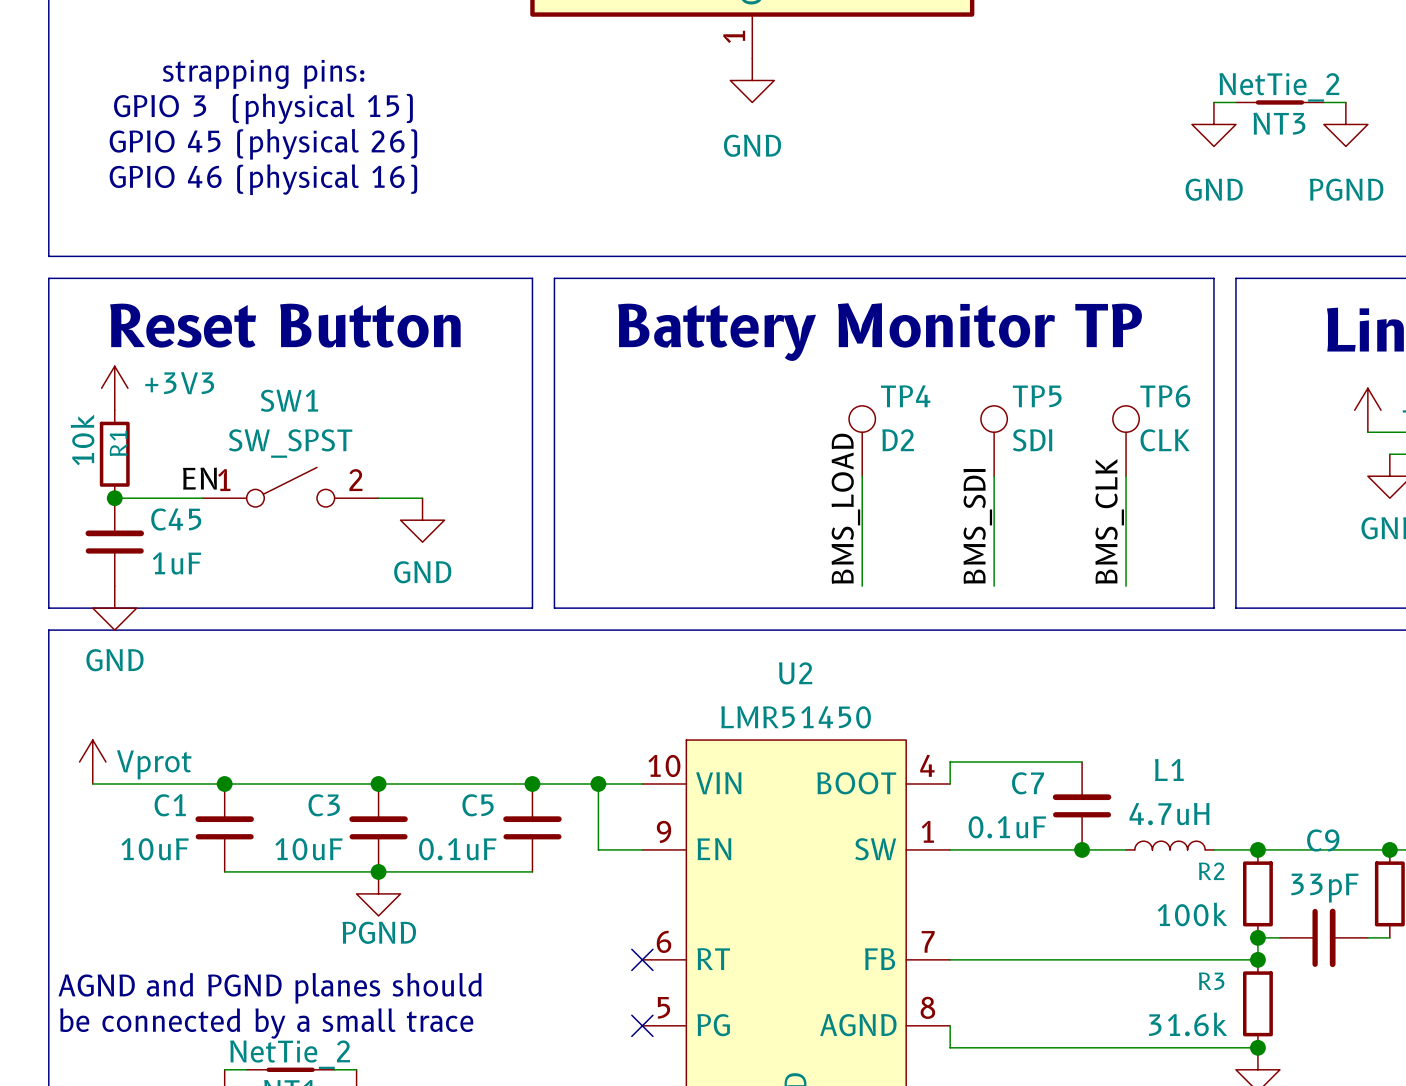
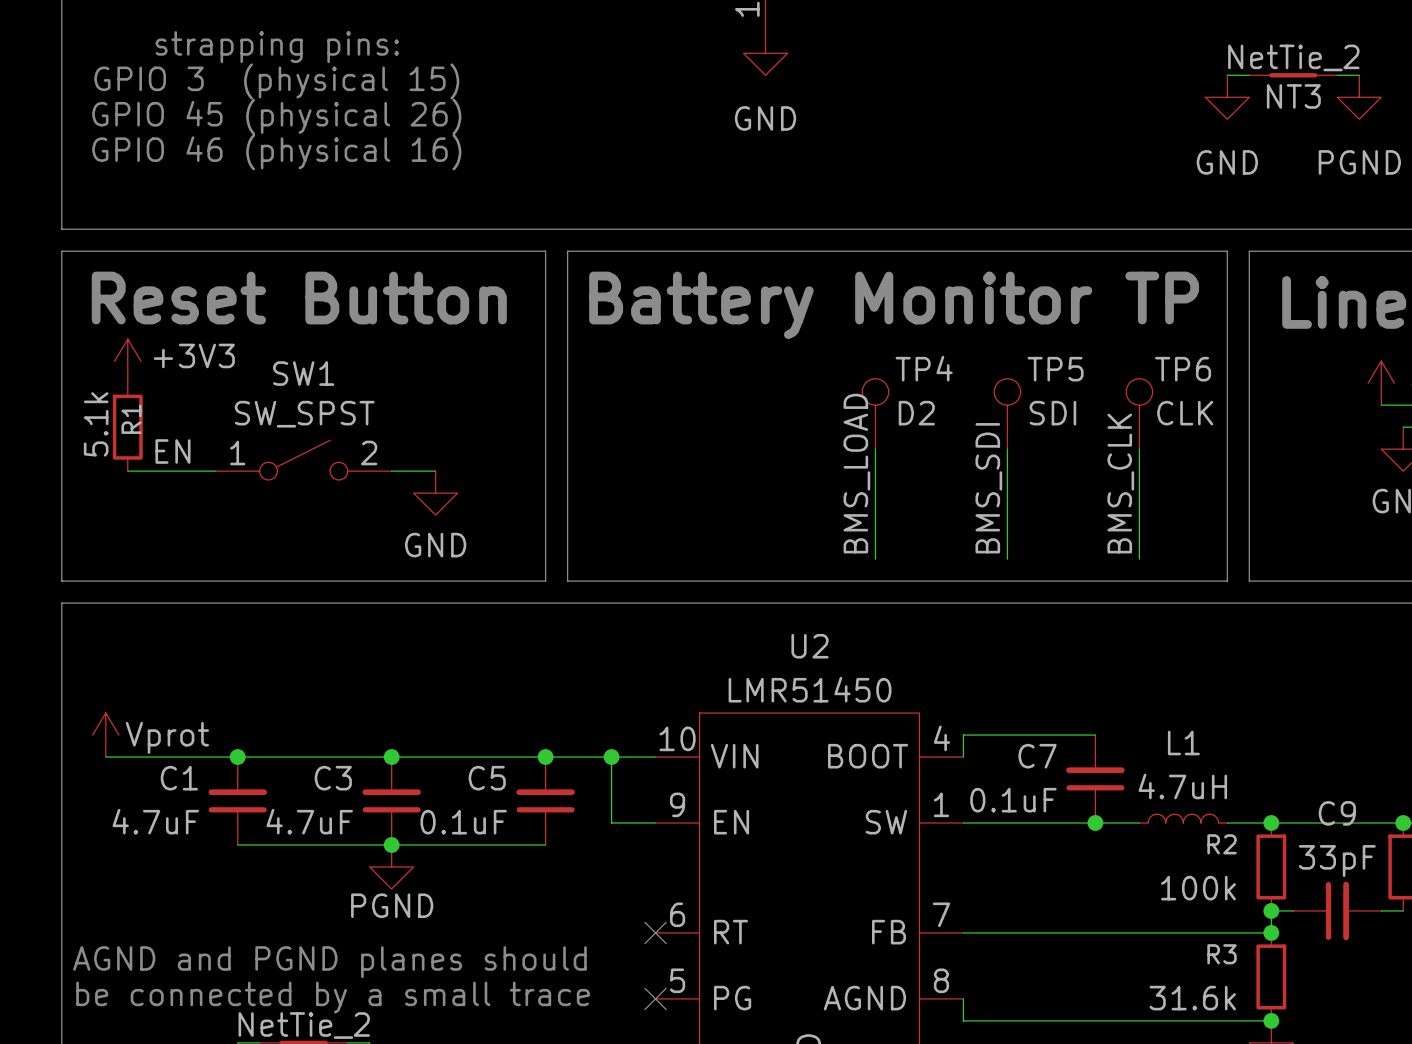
R1 value: 10k (82, 439) -> 5.1k (96, 424)
label position: EN (199, 478) -> EN (172, 451)
junction: (114, 498) -> none
C45: 1uF (114, 542) -> none
power symbol: GND (114, 608) -> none
C1 value: 10uF (155, 849) -> 4.7uF (155, 821)
C3 value: 10uF (308, 849) -> 4.7uF (309, 821)

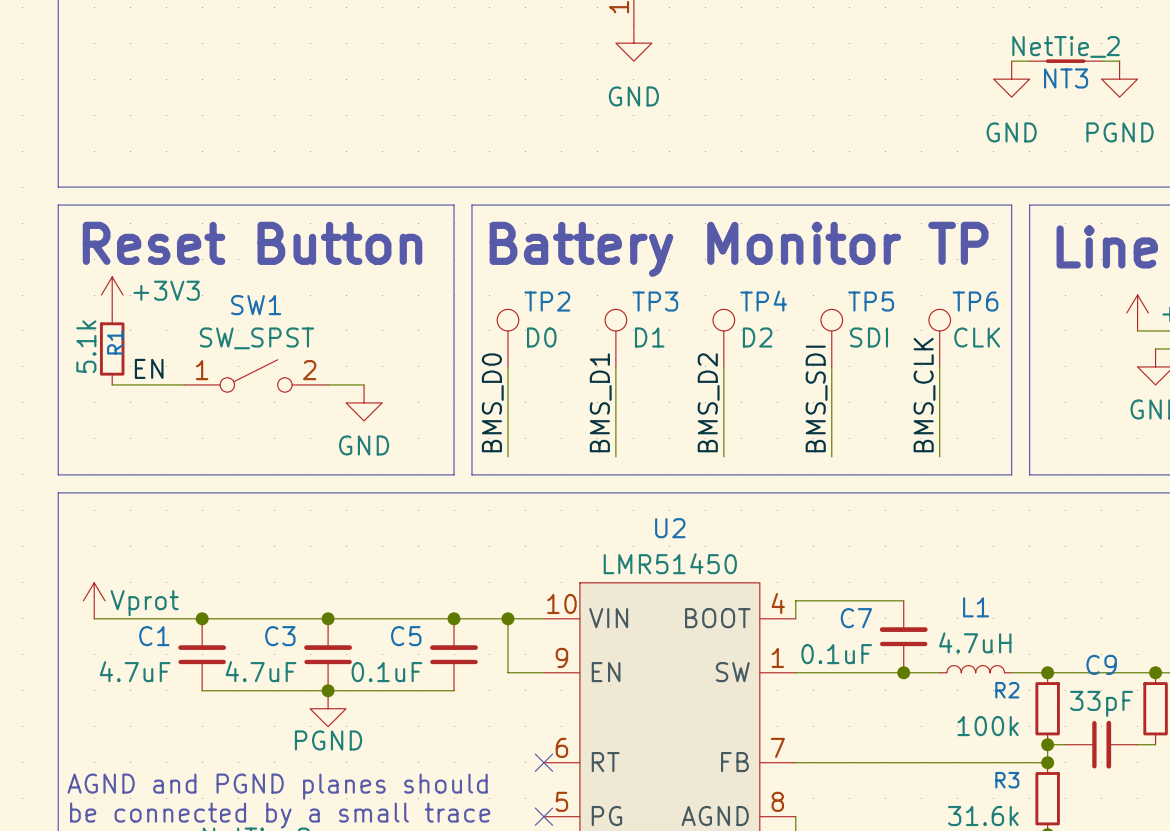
text: strapping pins: (277, 47) -> none
text: GPIO 3 (physical 15) (276, 81) -> none
text: GPIO 45 (physical 26) (276, 116) -> none
text: GPIO 46 (physical 16) (276, 152) -> none
TP2: none -> D0 (507, 338)
TP3: none -> D1 (615, 338)
wire: none -> (507, 366) (507, 456)
wire: none -> (615, 366) (615, 456)
label: BMS_LOAD (856, 473) -> BMS_D2 (708, 402)
label: none -> BMS_D0 (492, 402)
label: none -> BMS_D1 (600, 402)

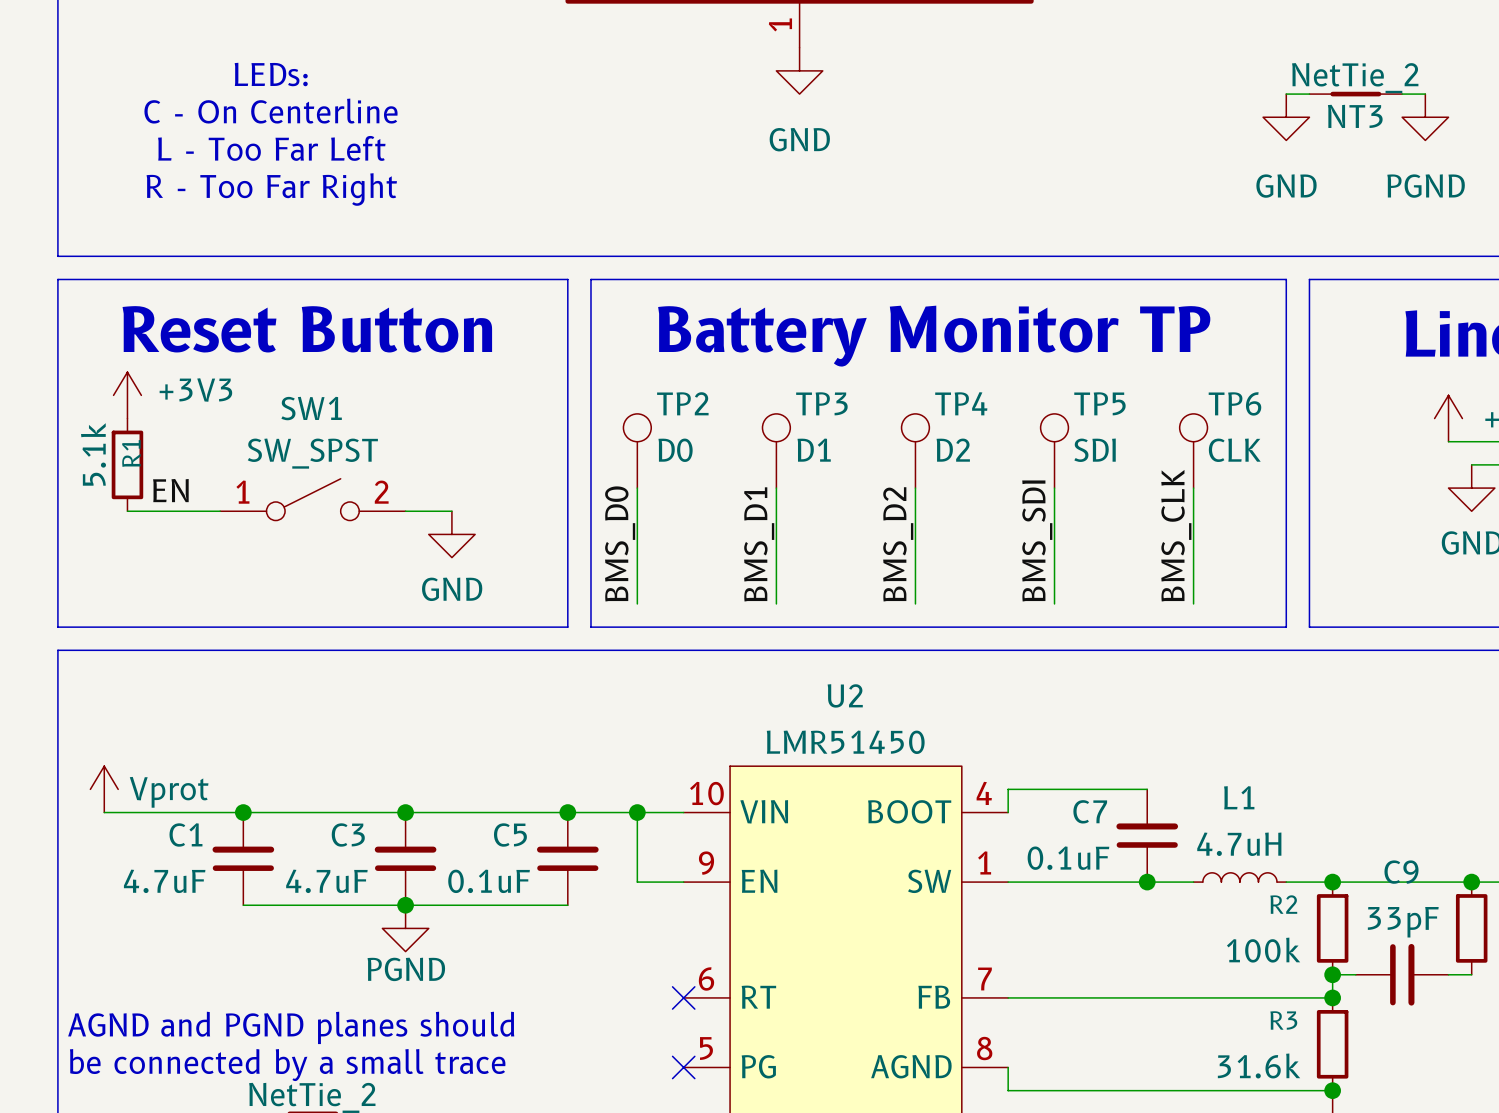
text: none -> LEDs: (271, 74)
text: none -> C - On Centerline (270, 111)
text: none -> L - Too Far Left (271, 148)
text: none -> R - Too Far Right (271, 189)

